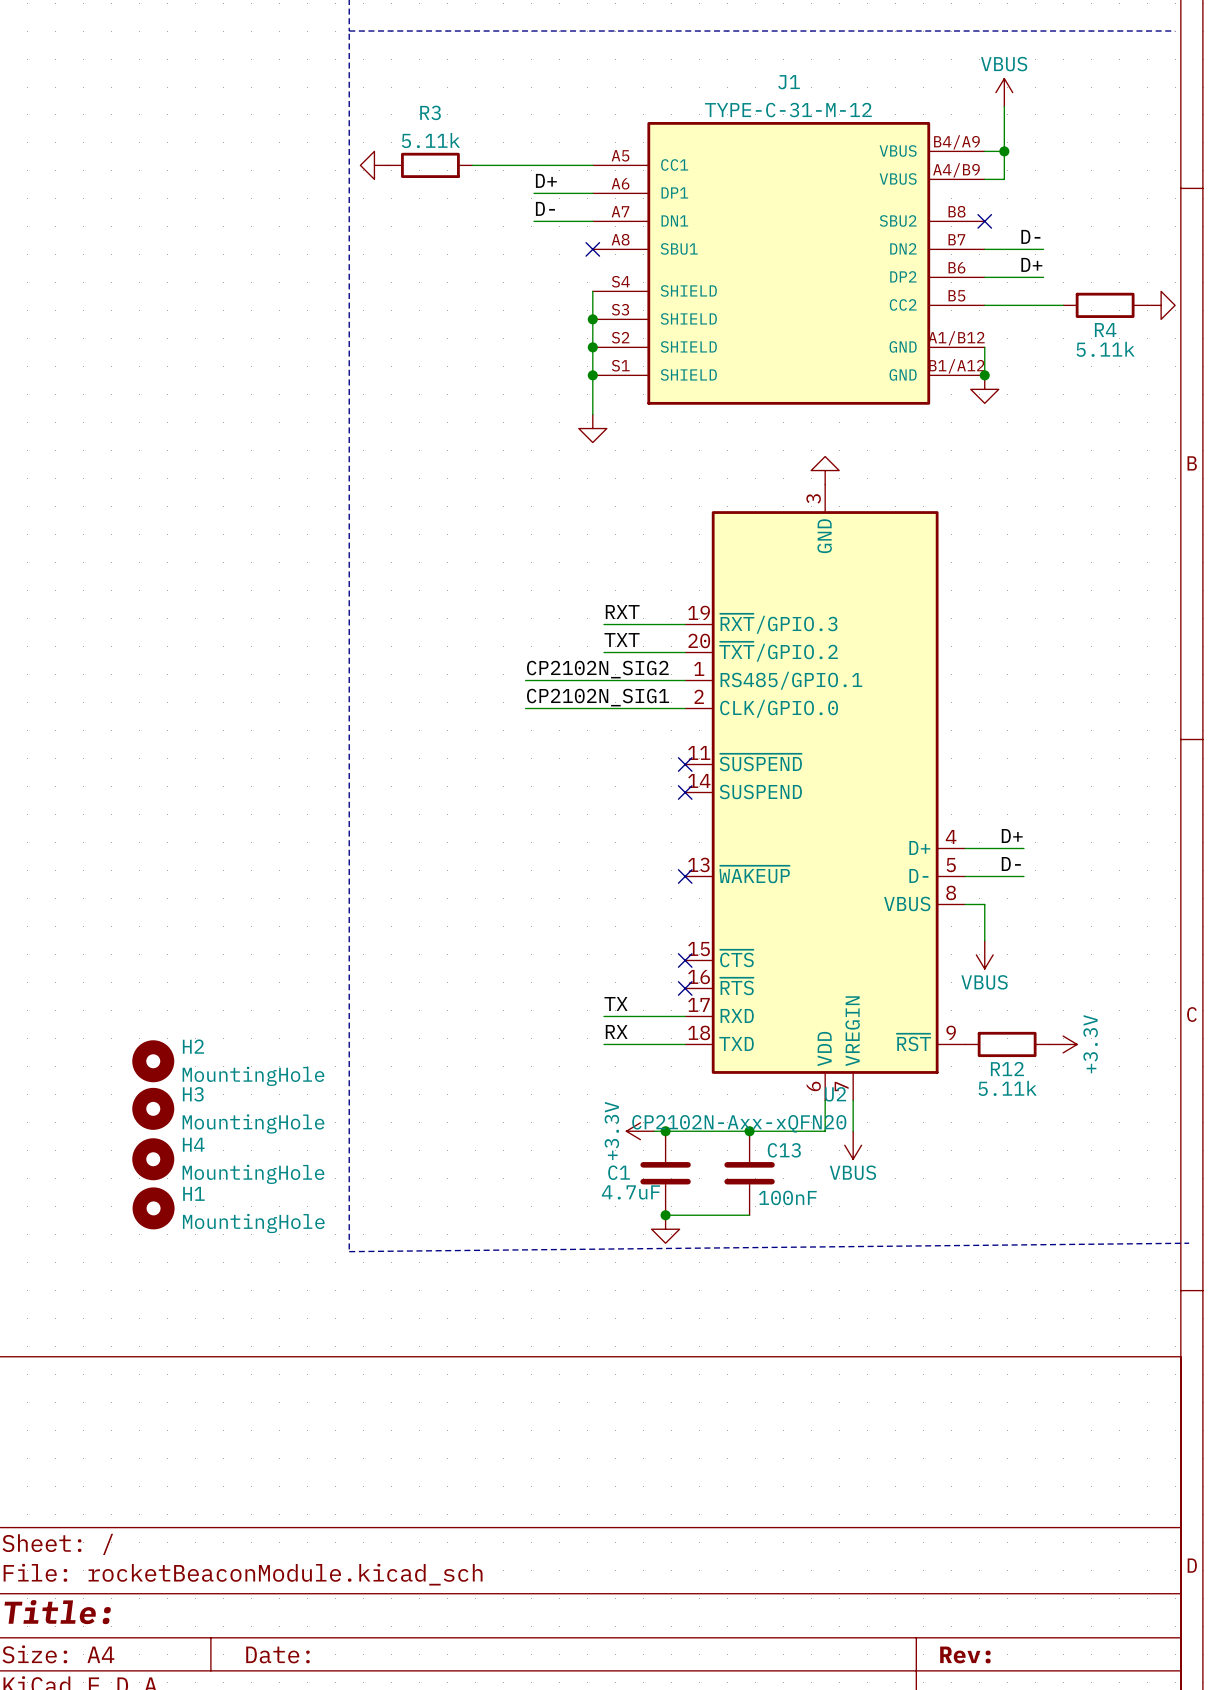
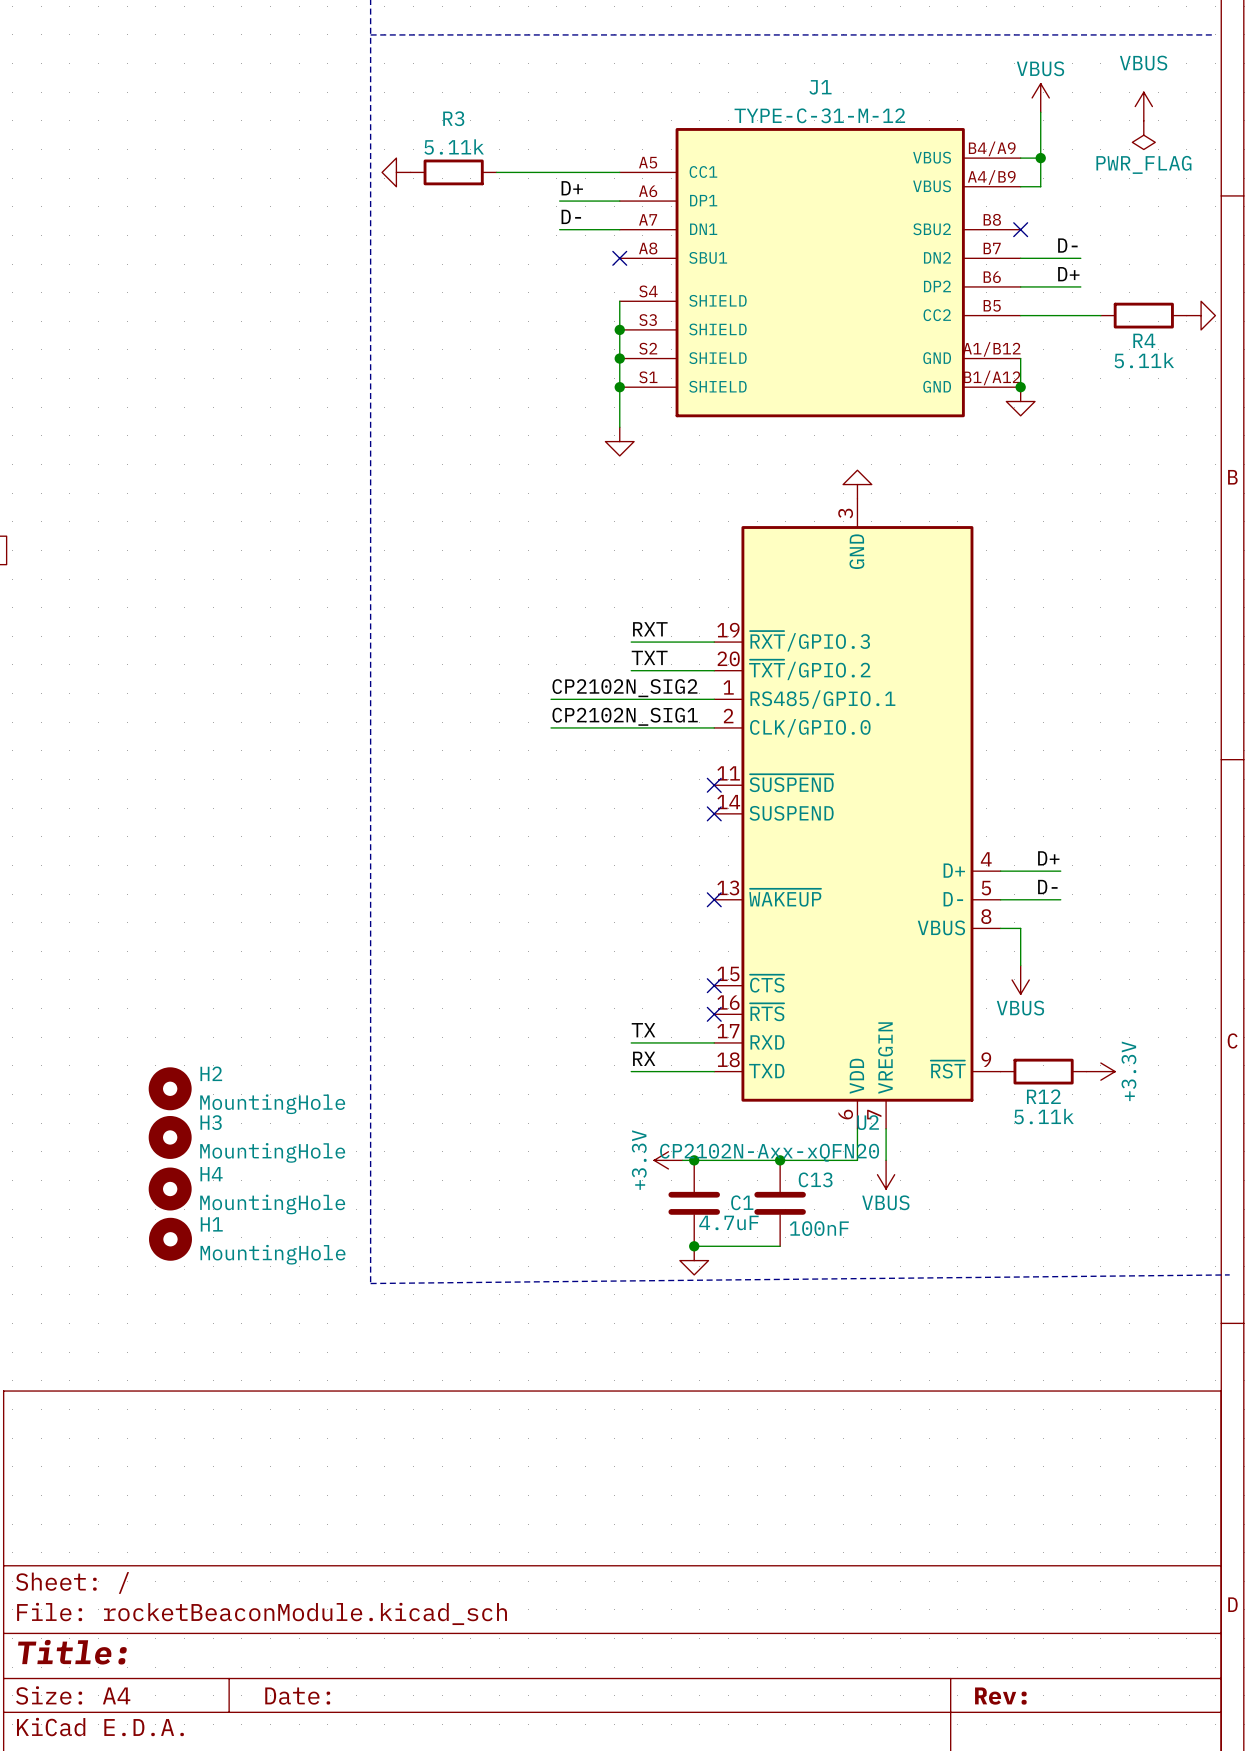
power symbol: none -> VBUS (1143, 106)
power symbol: none -> PWR_FLAG (1143, 135)
C1 name position: C1 (619, 1172) -> C1 (742, 1202)
C1 value position: 4.7uF (630, 1192) -> 4.7uF (728, 1222)

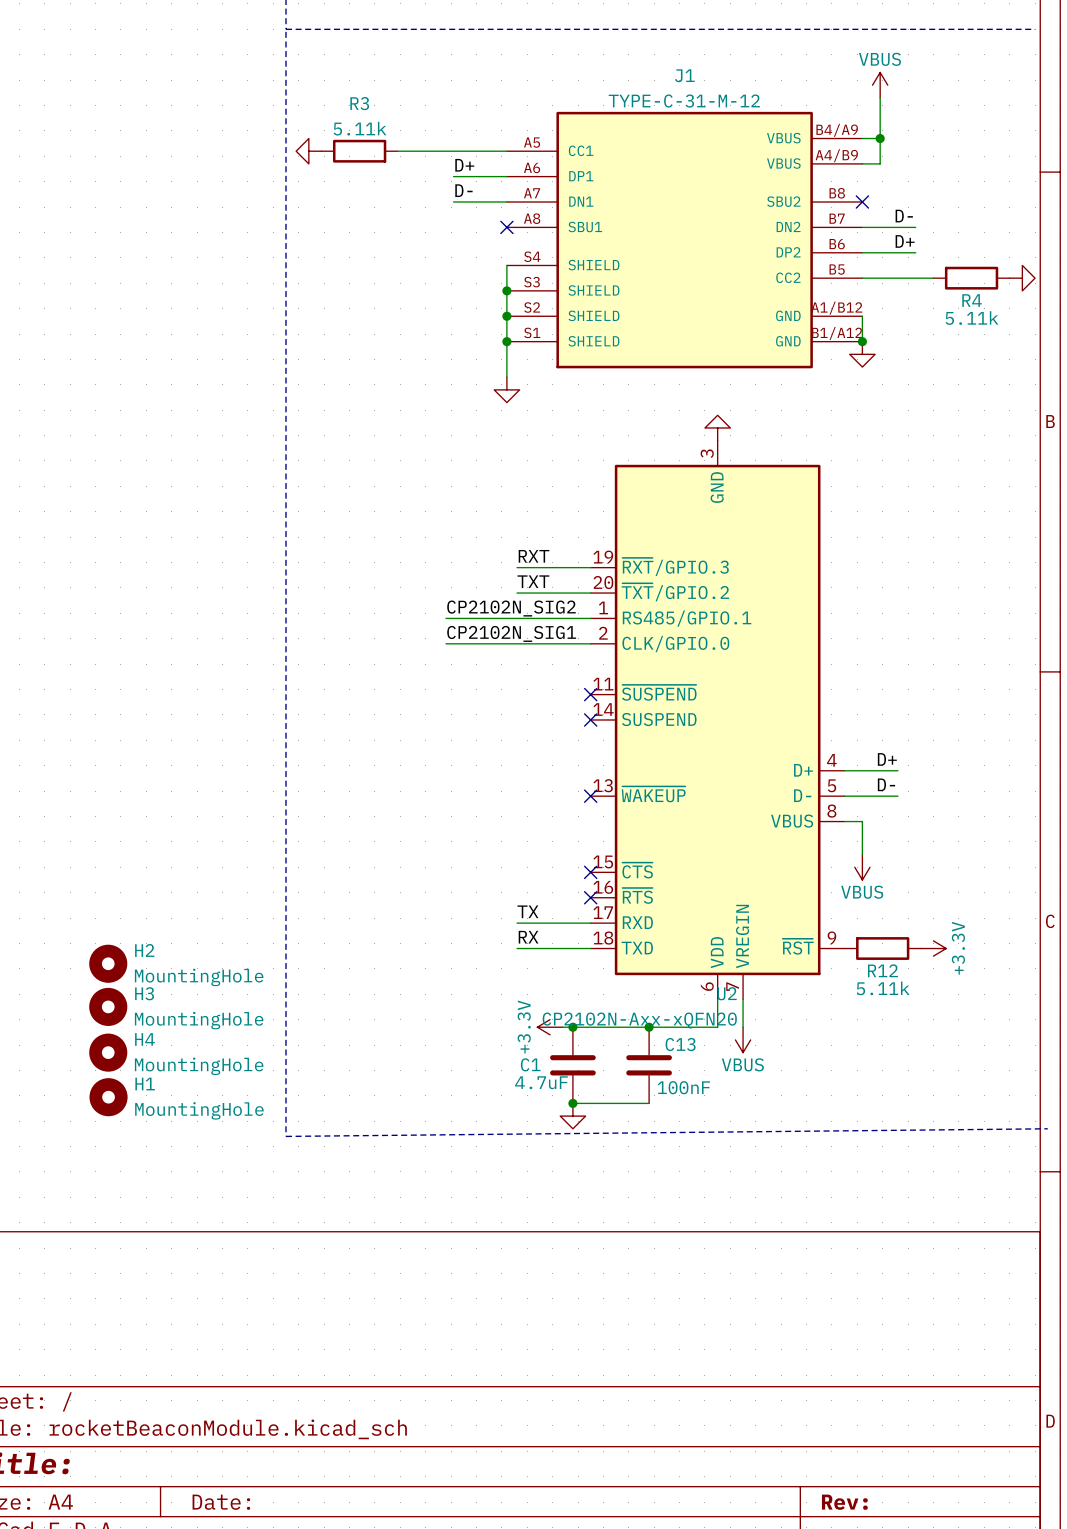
power symbol: VBUS (1143, 106) -> none
power symbol: PWR_FLAG (1143, 135) -> none
C1 name position: C1 (742, 1202) -> C1 (530, 1064)
C1 value position: 4.7uF (728, 1222) -> 4.7uF (541, 1082)

